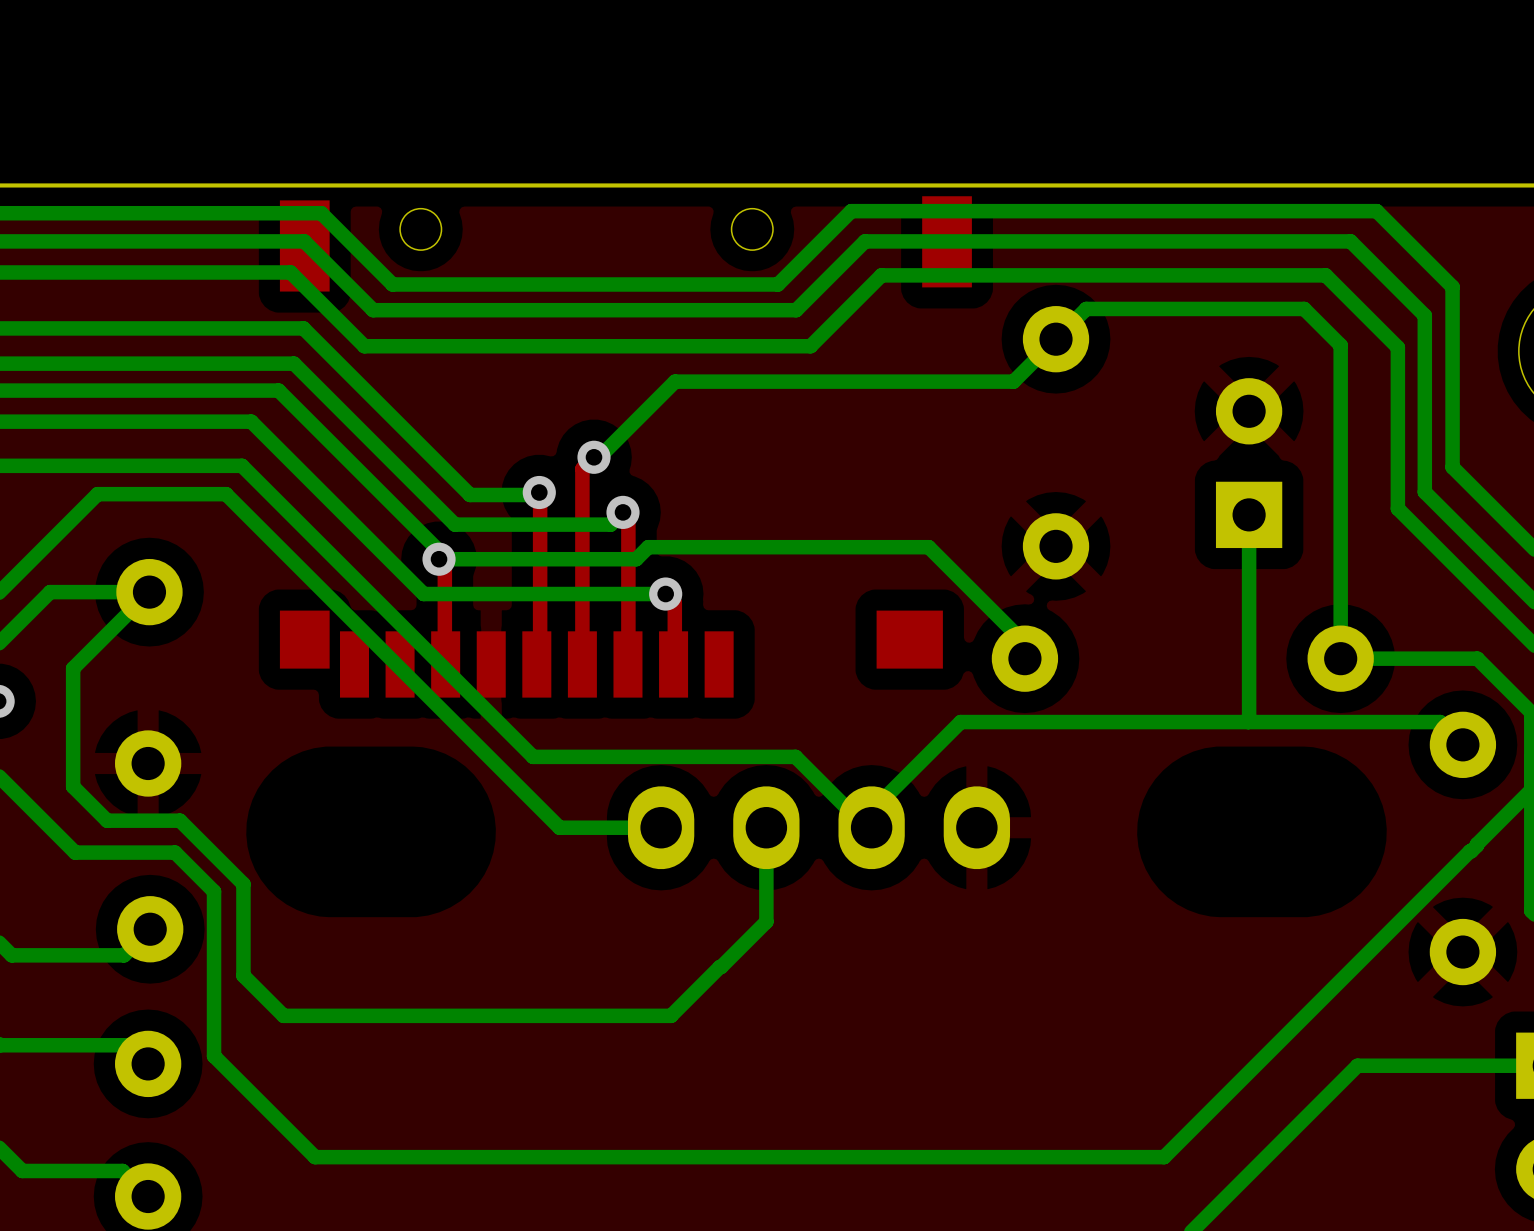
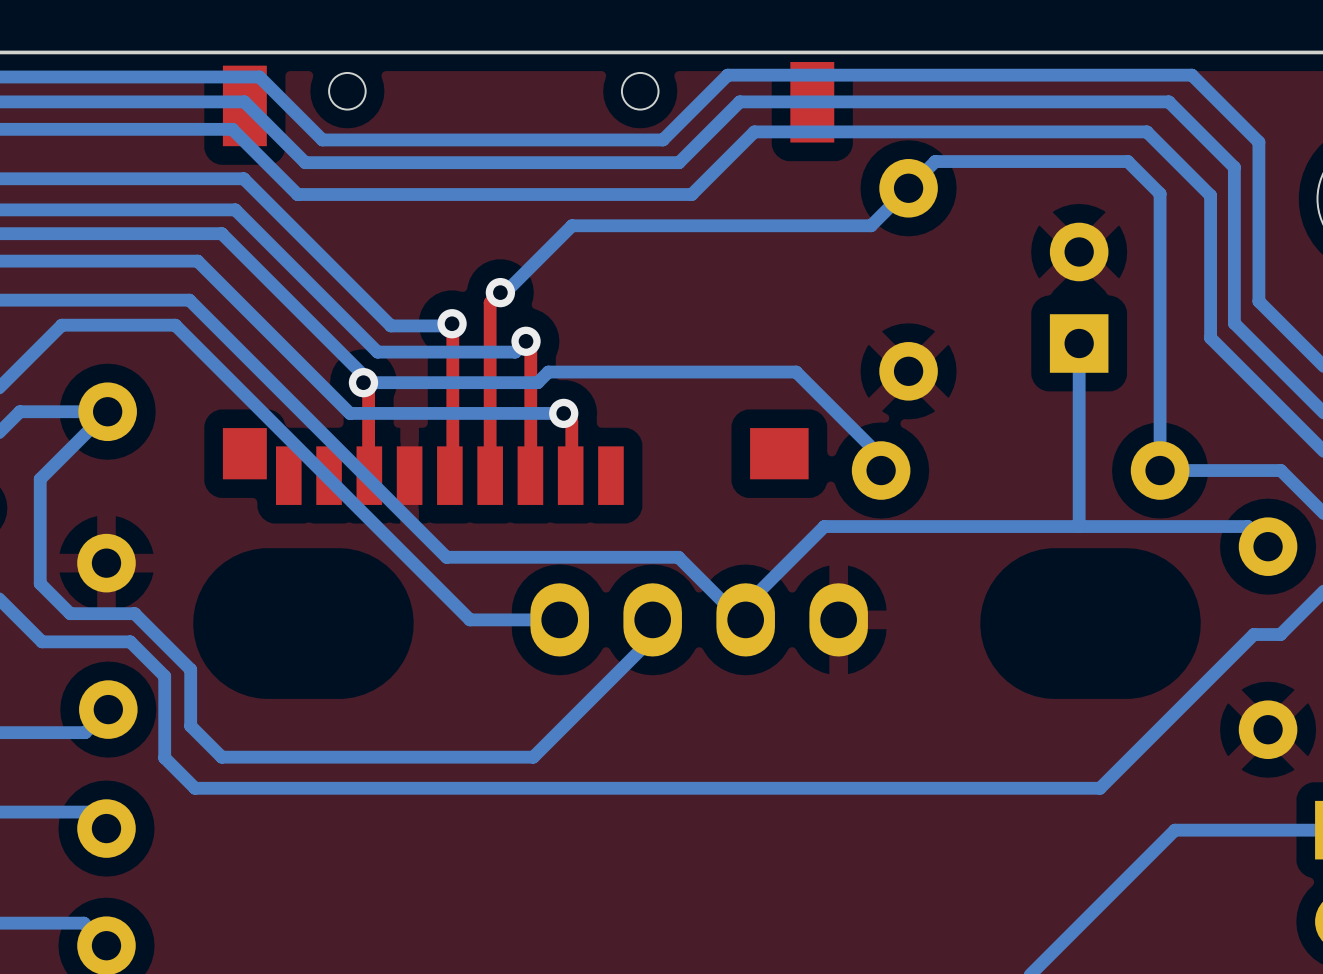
bottom track: (1477, 844) (1164, 1157) (315, 1157) (214, 1056) (214, 983) -> (1280, 634) (1253, 634) (1100, 788) (195, 788) (164, 757)
bottom track: (766, 848) (766, 921) (671, 1015) (283, 1015) (243, 975) (243, 947) -> (652, 637) (533, 757) (221, 757) (190, 726)

